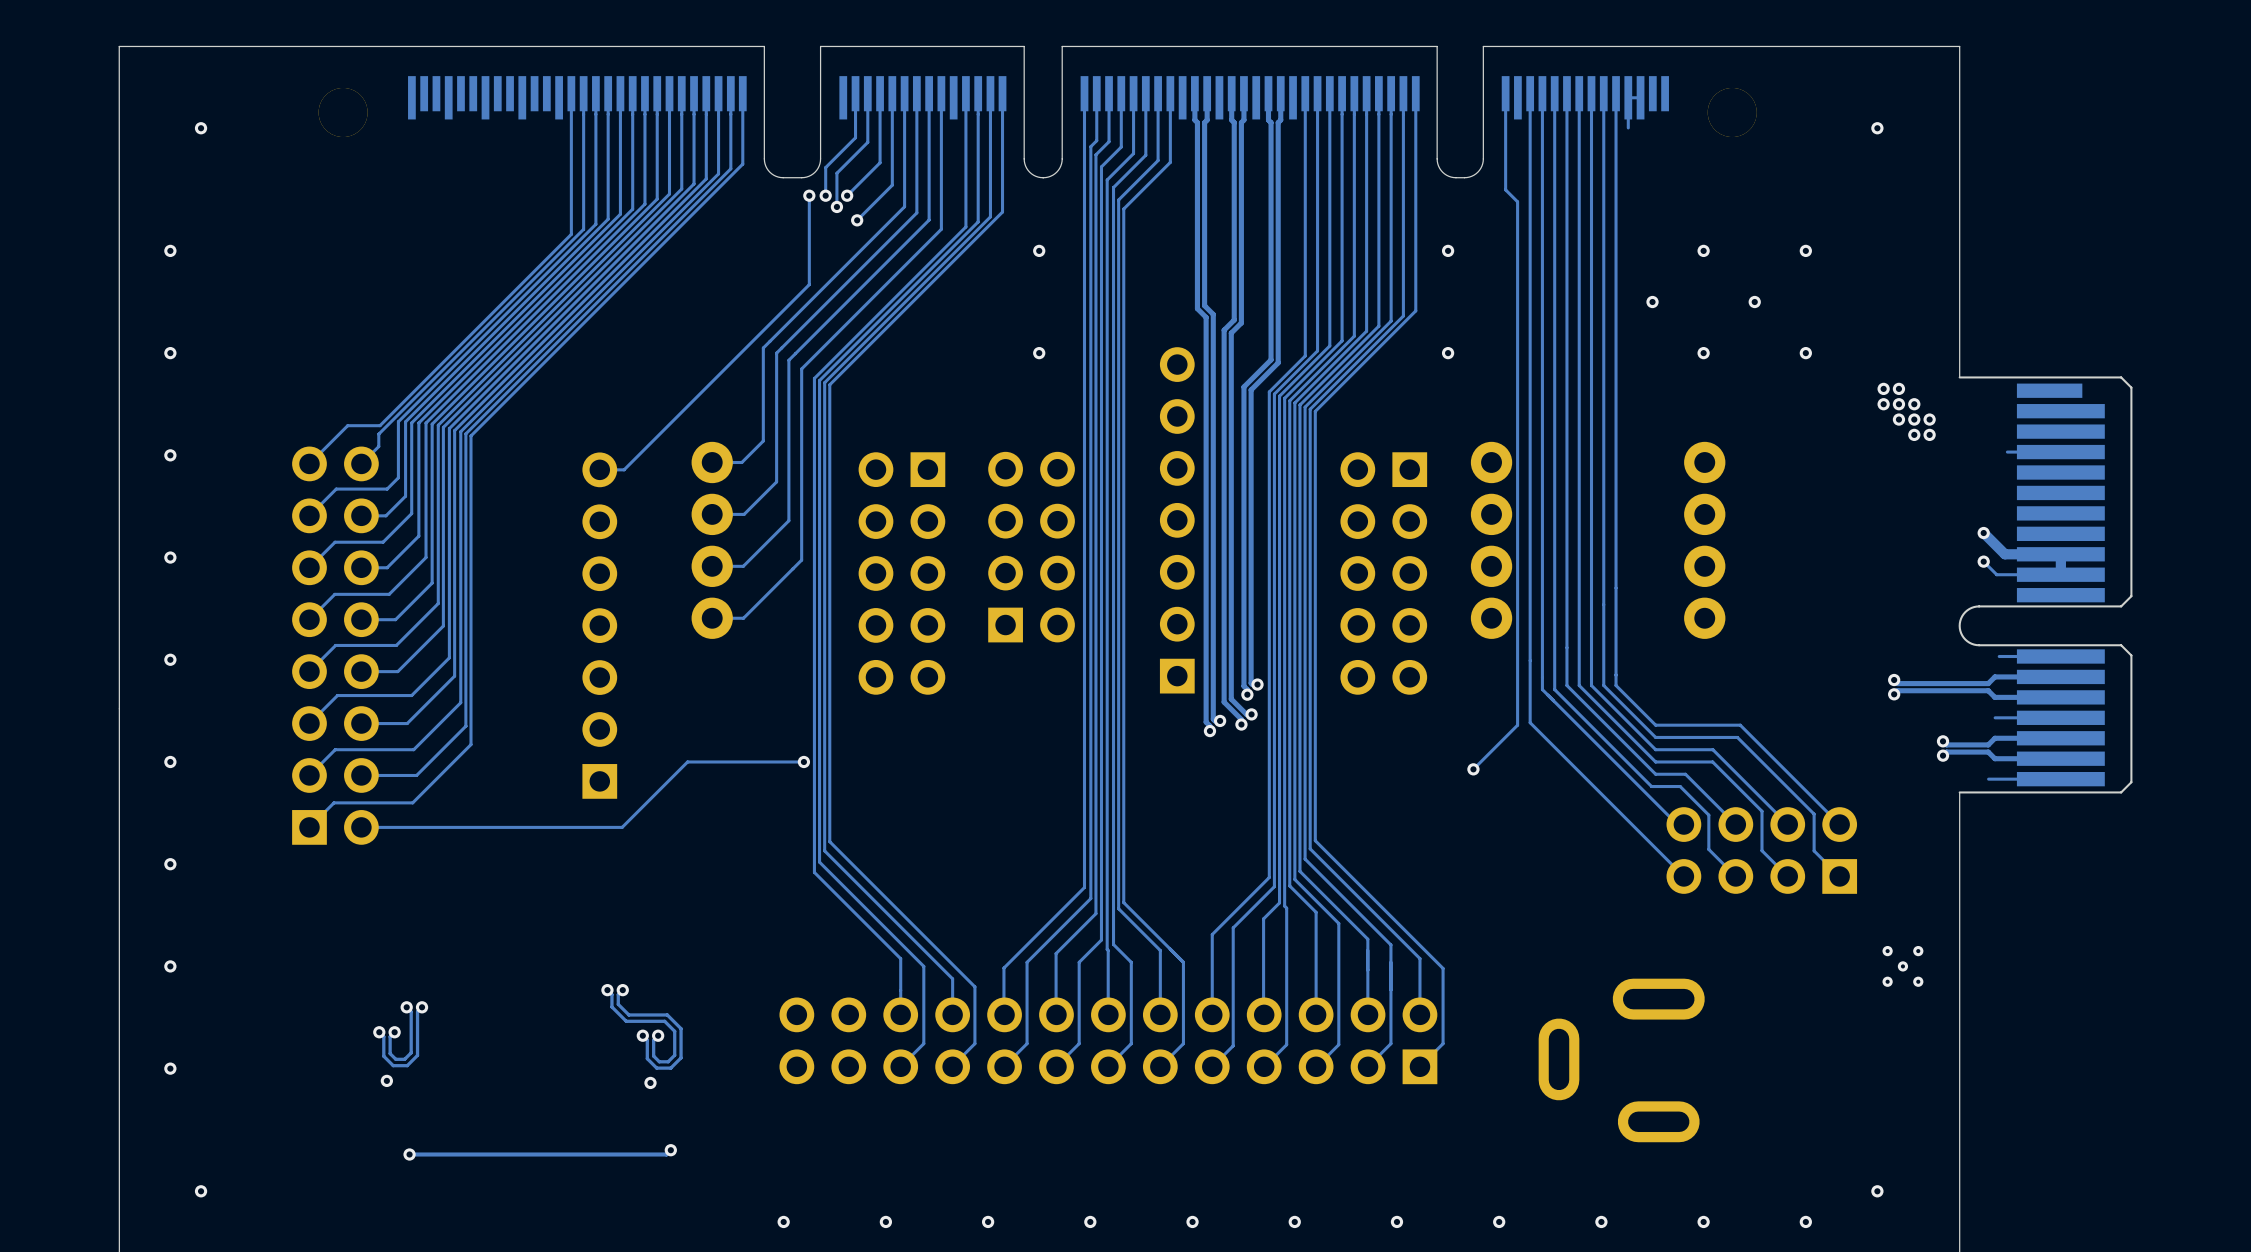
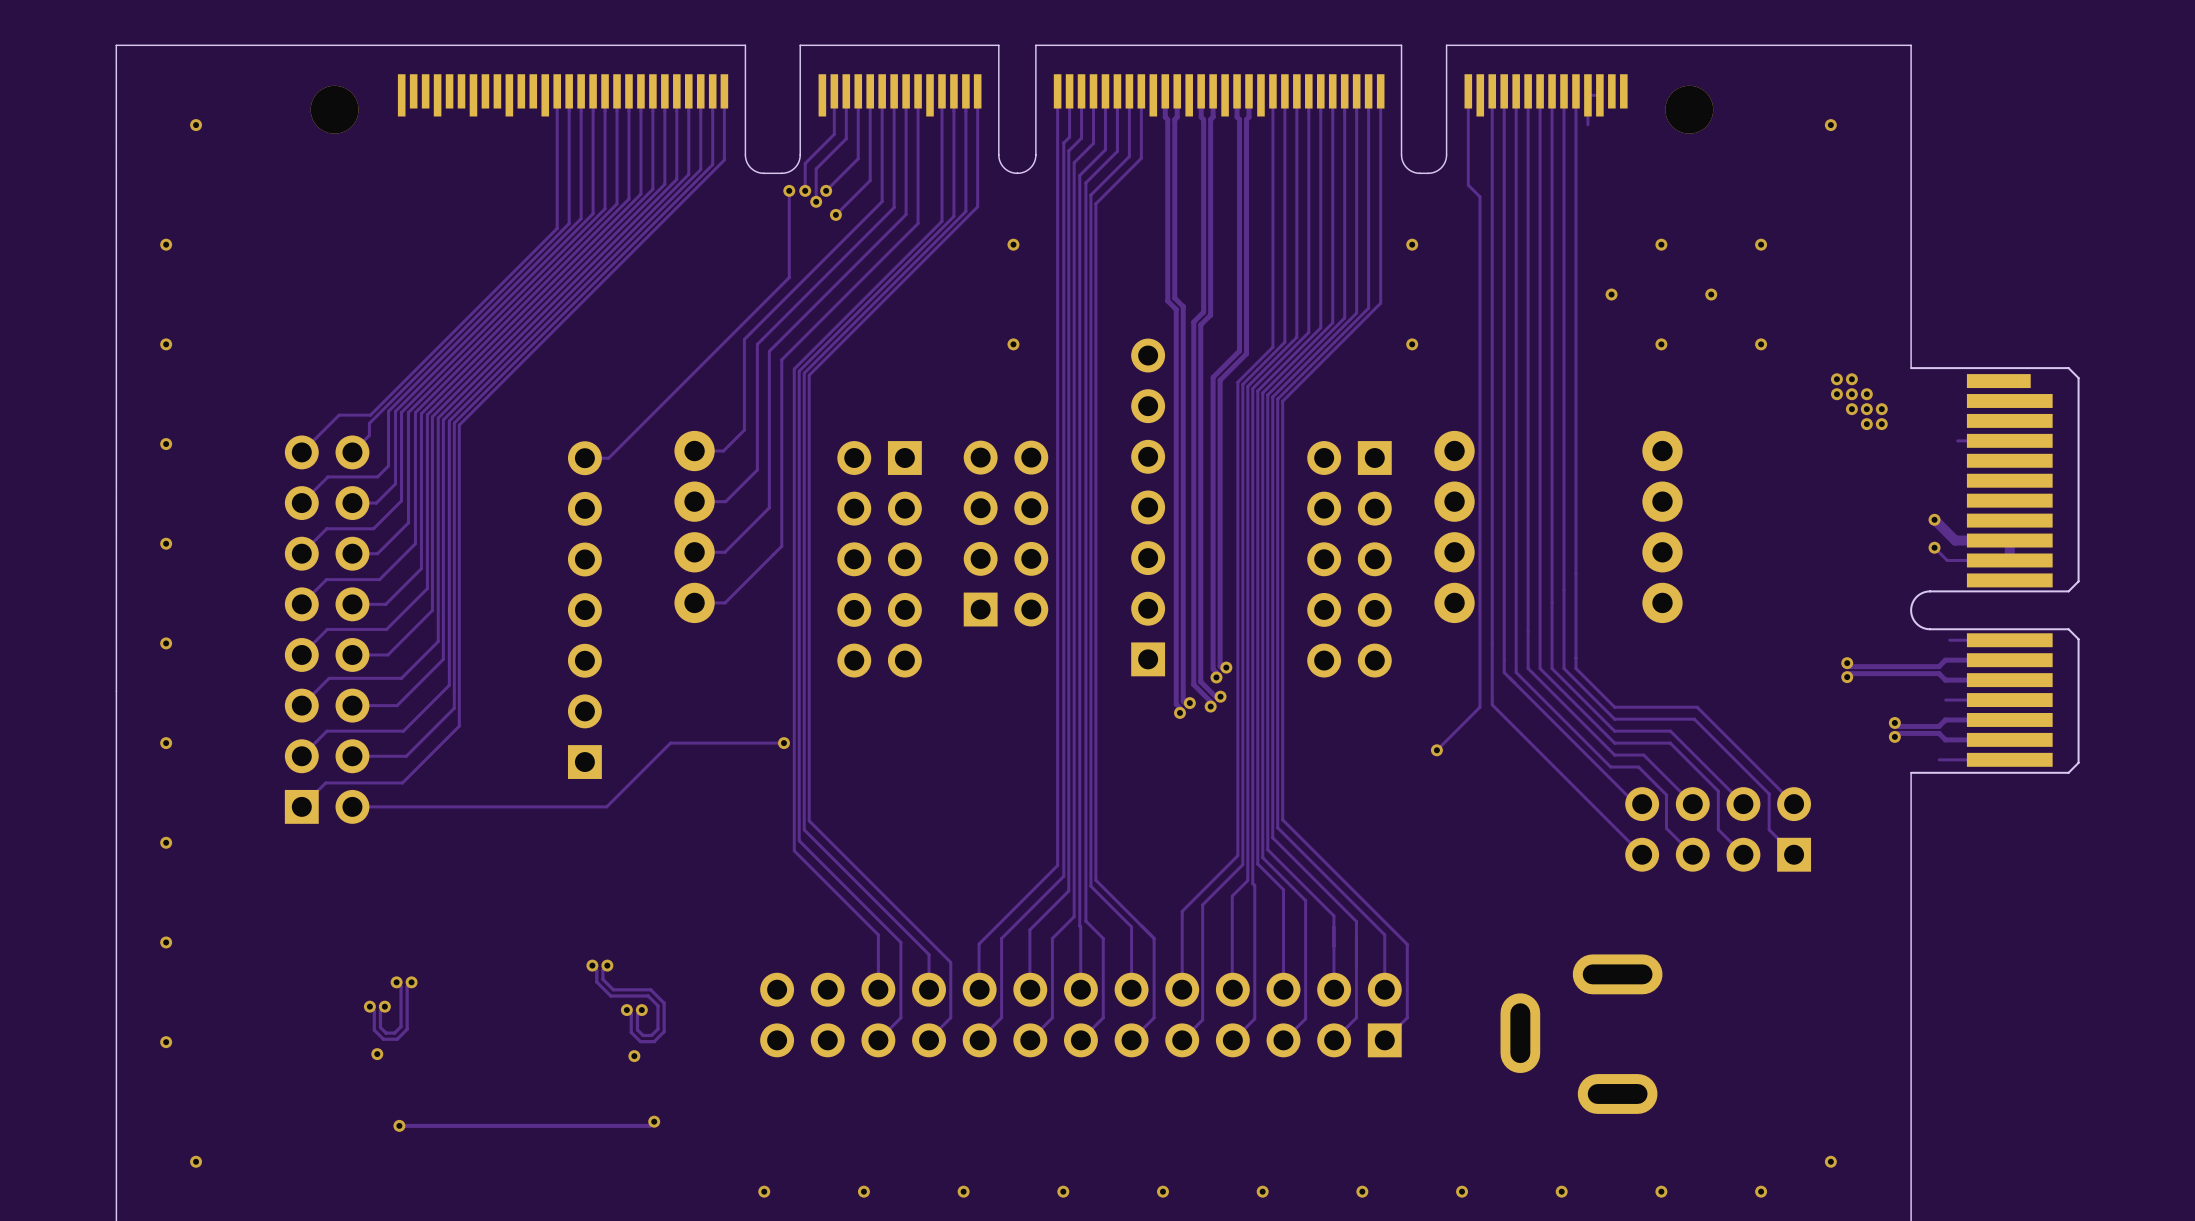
via: (1887, 951) -> none
via: (1918, 951) -> none
via: (1902, 966) -> none
via: (1887, 981) -> none
via: (1918, 981) -> none

